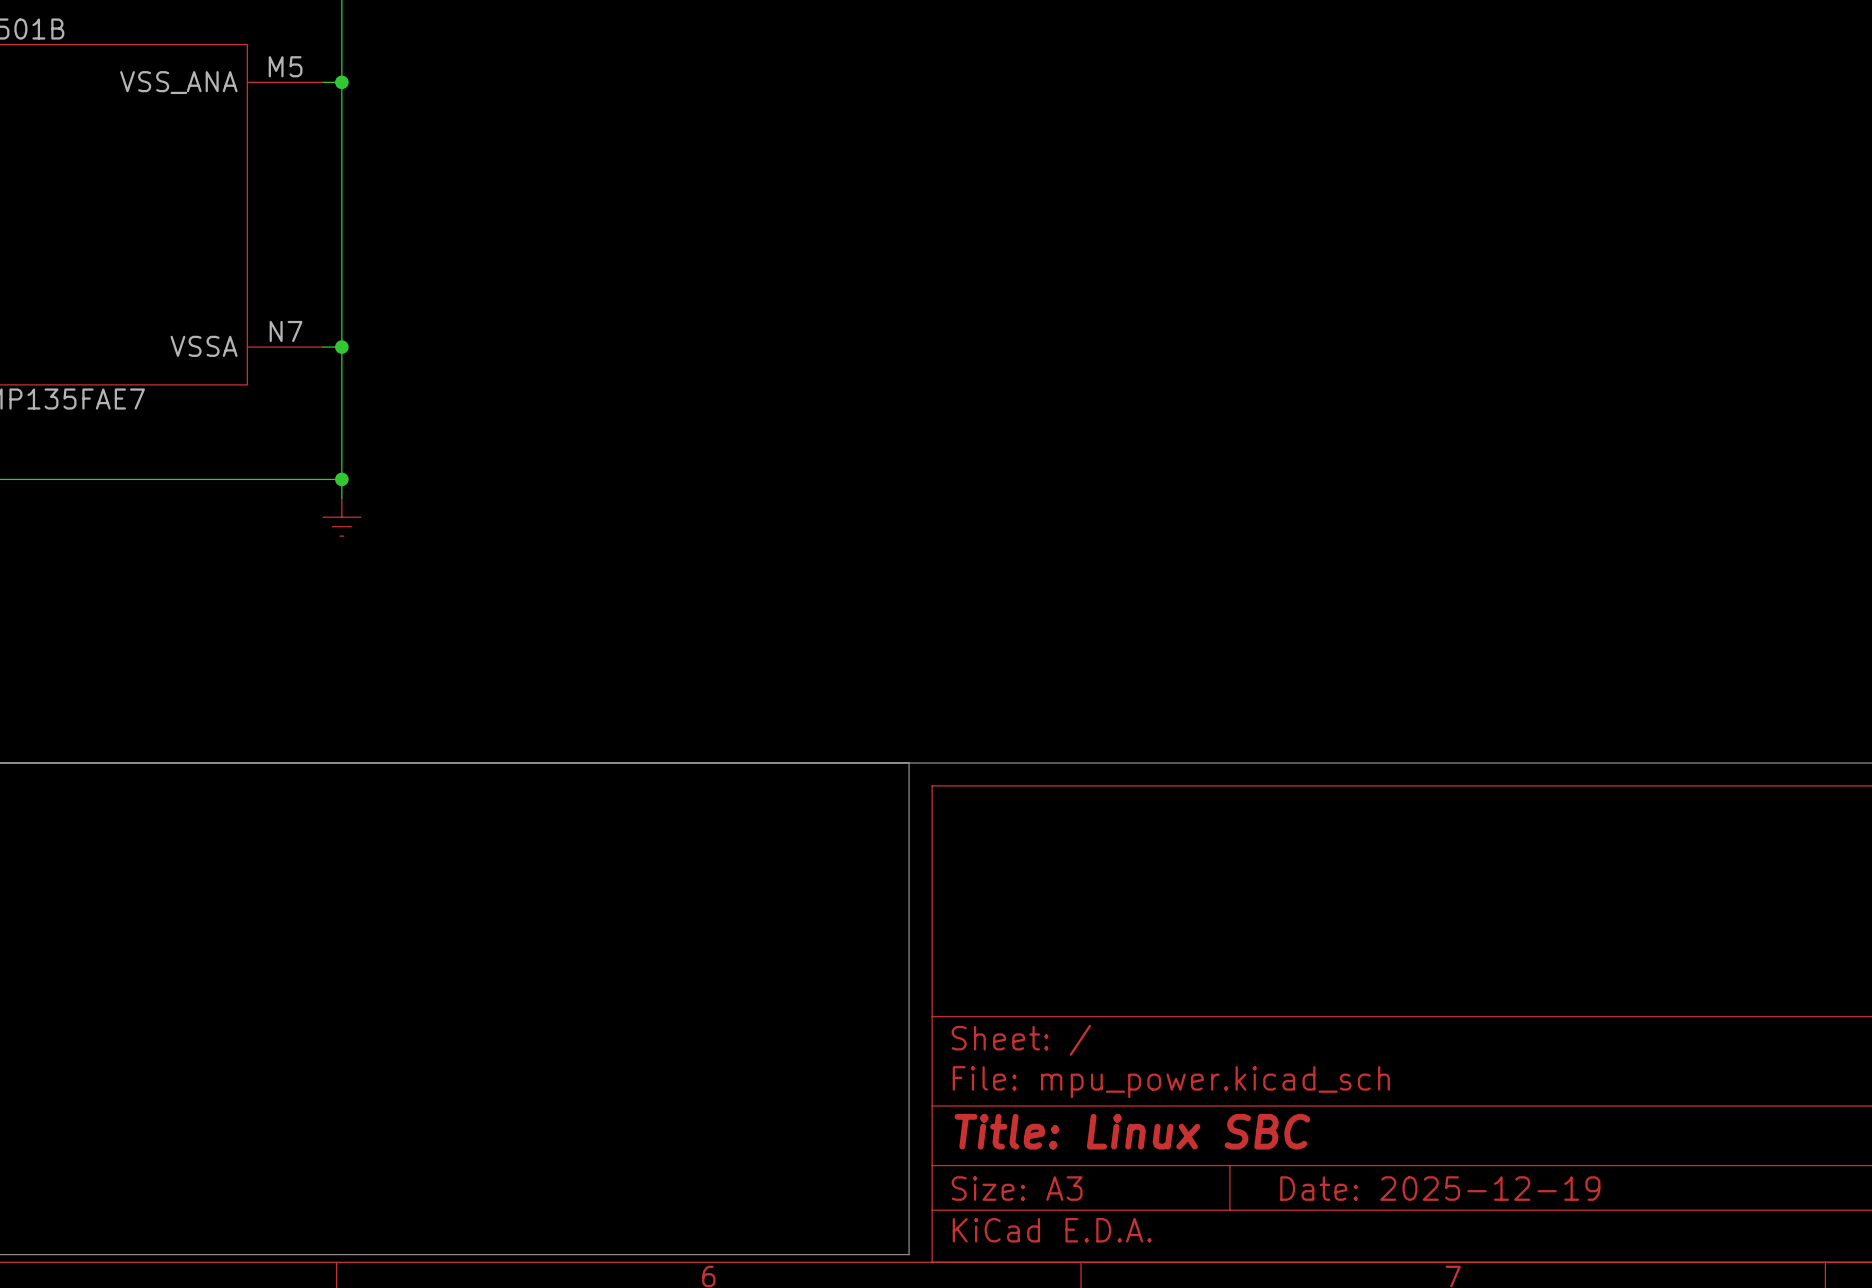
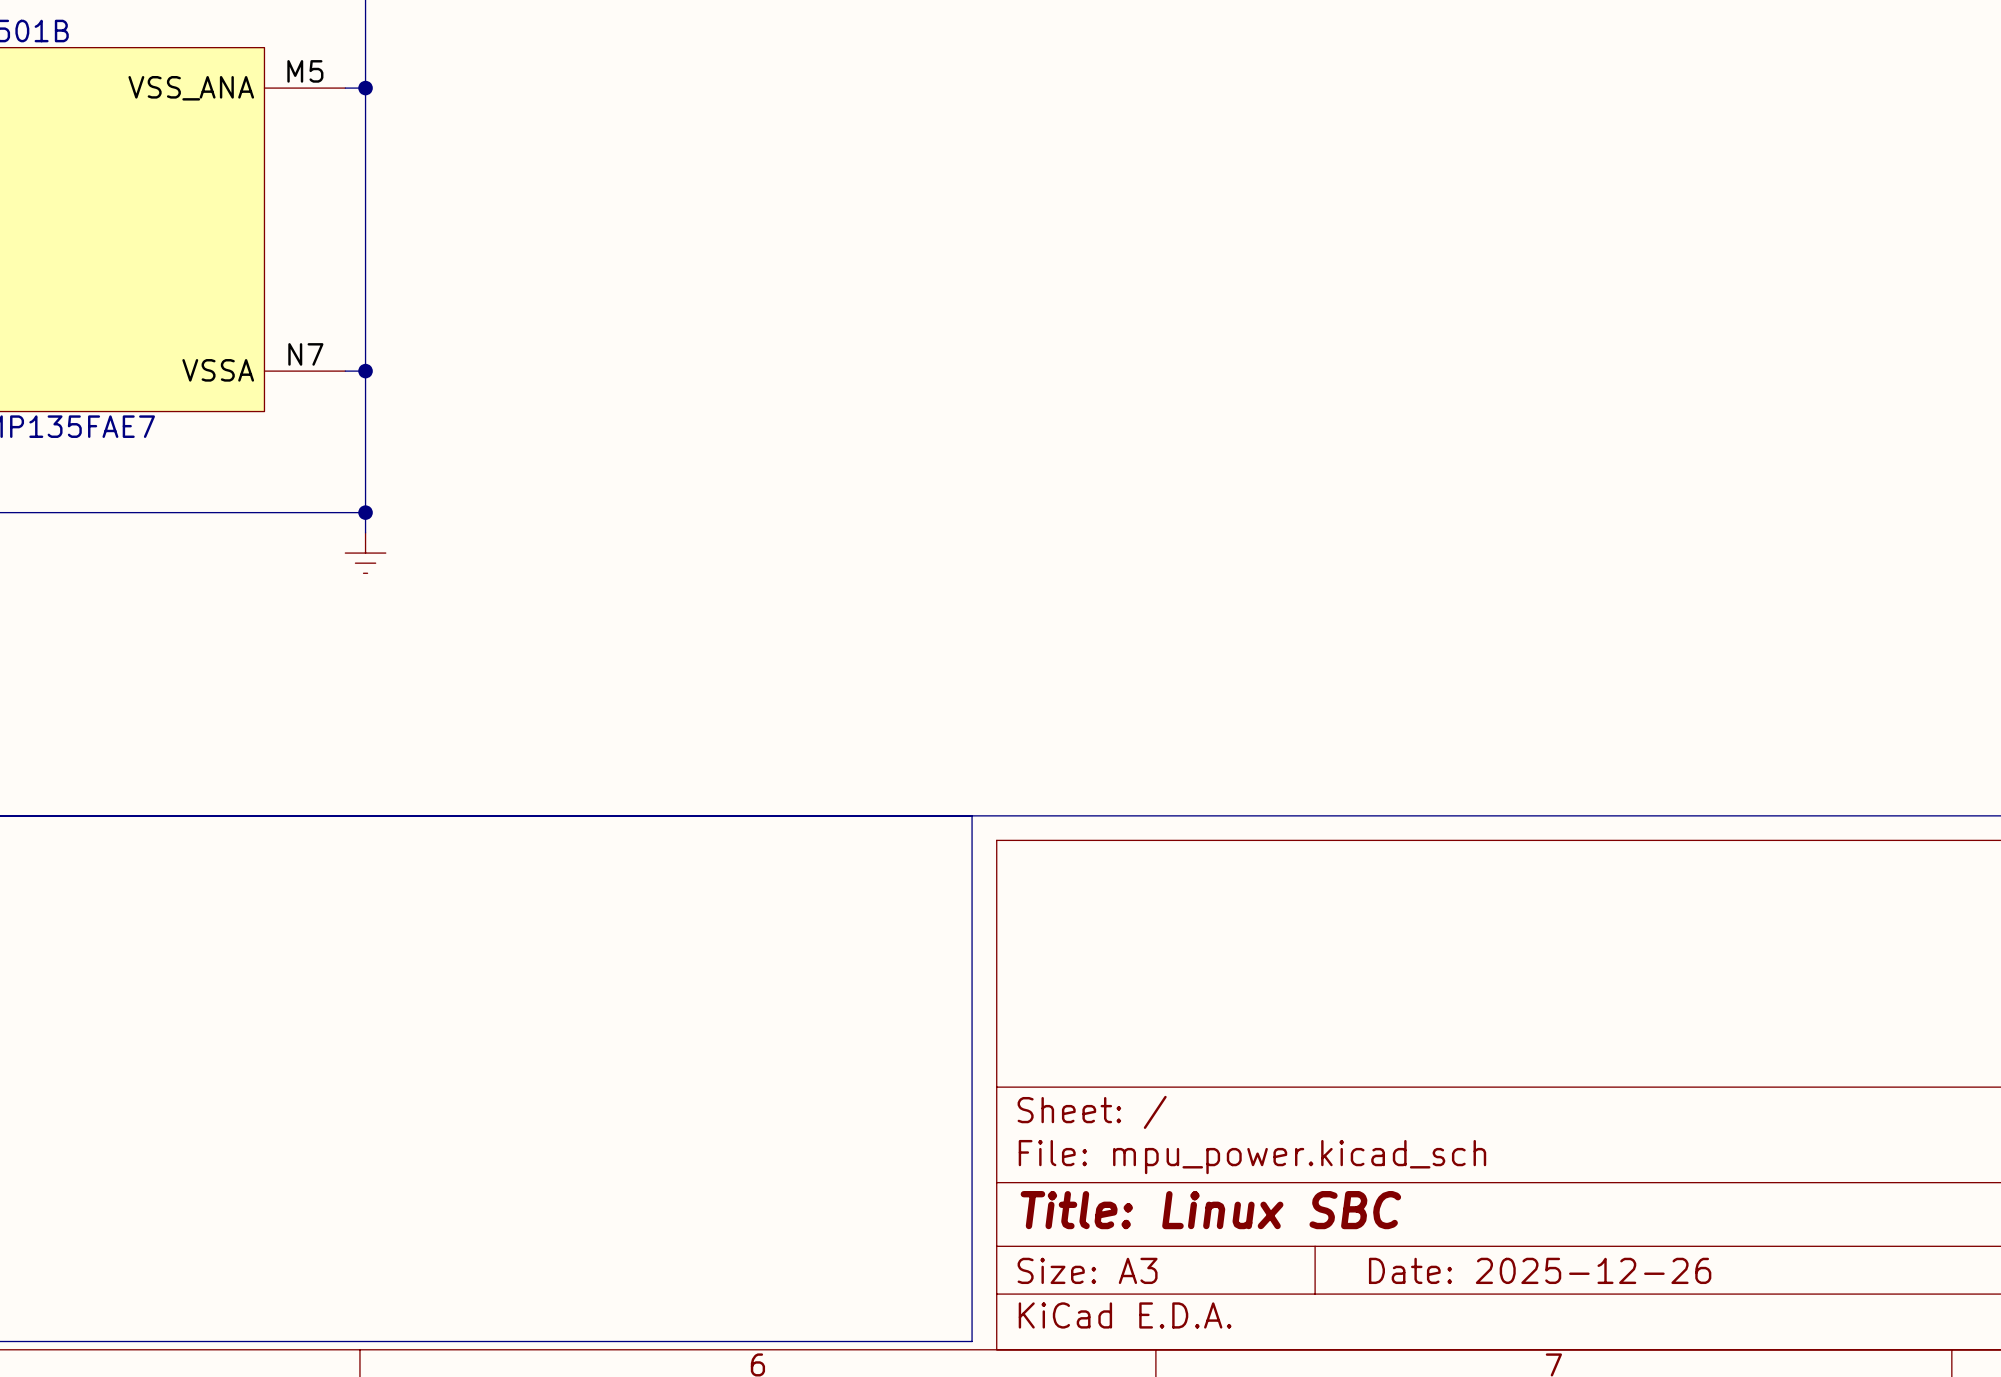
title block: Date: 2025-12-19 (1440, 1188) -> Date: 2025-12-26 (1540, 1270)

